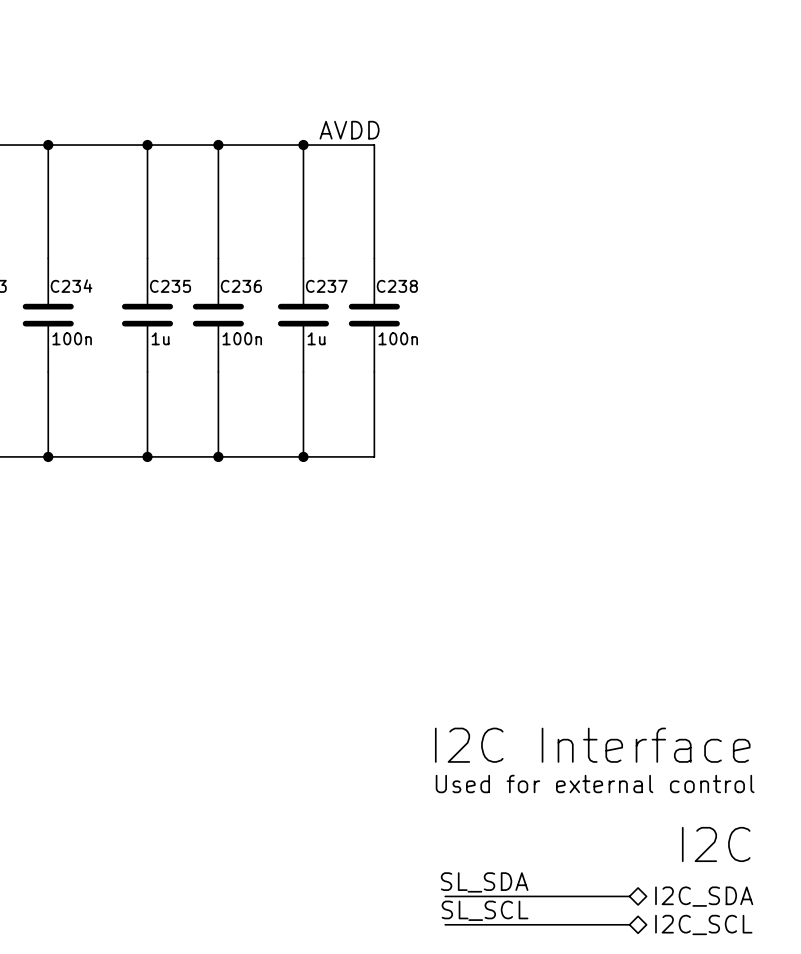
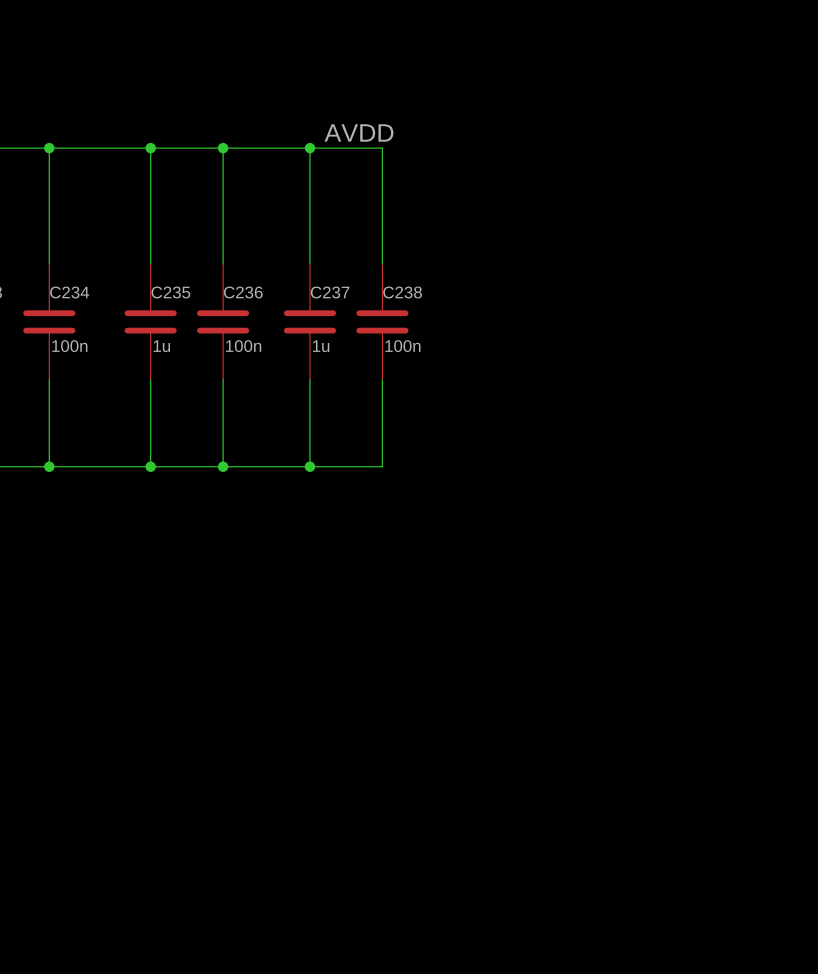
text: I2C Interface (592, 745) -> none
text: Used for external control (595, 783) -> none
text: I2C (716, 844) -> none
label: SL_SDA (484, 882) -> none
wire: (445, 896) (629, 896) -> none
hierarchical label: I2C_SDA (704, 896) -> none
label: SL_SCL (485, 910) -> none
wire: (445, 924) (629, 924) -> none
hierarchical label: I2C_SCL (703, 924) -> none

